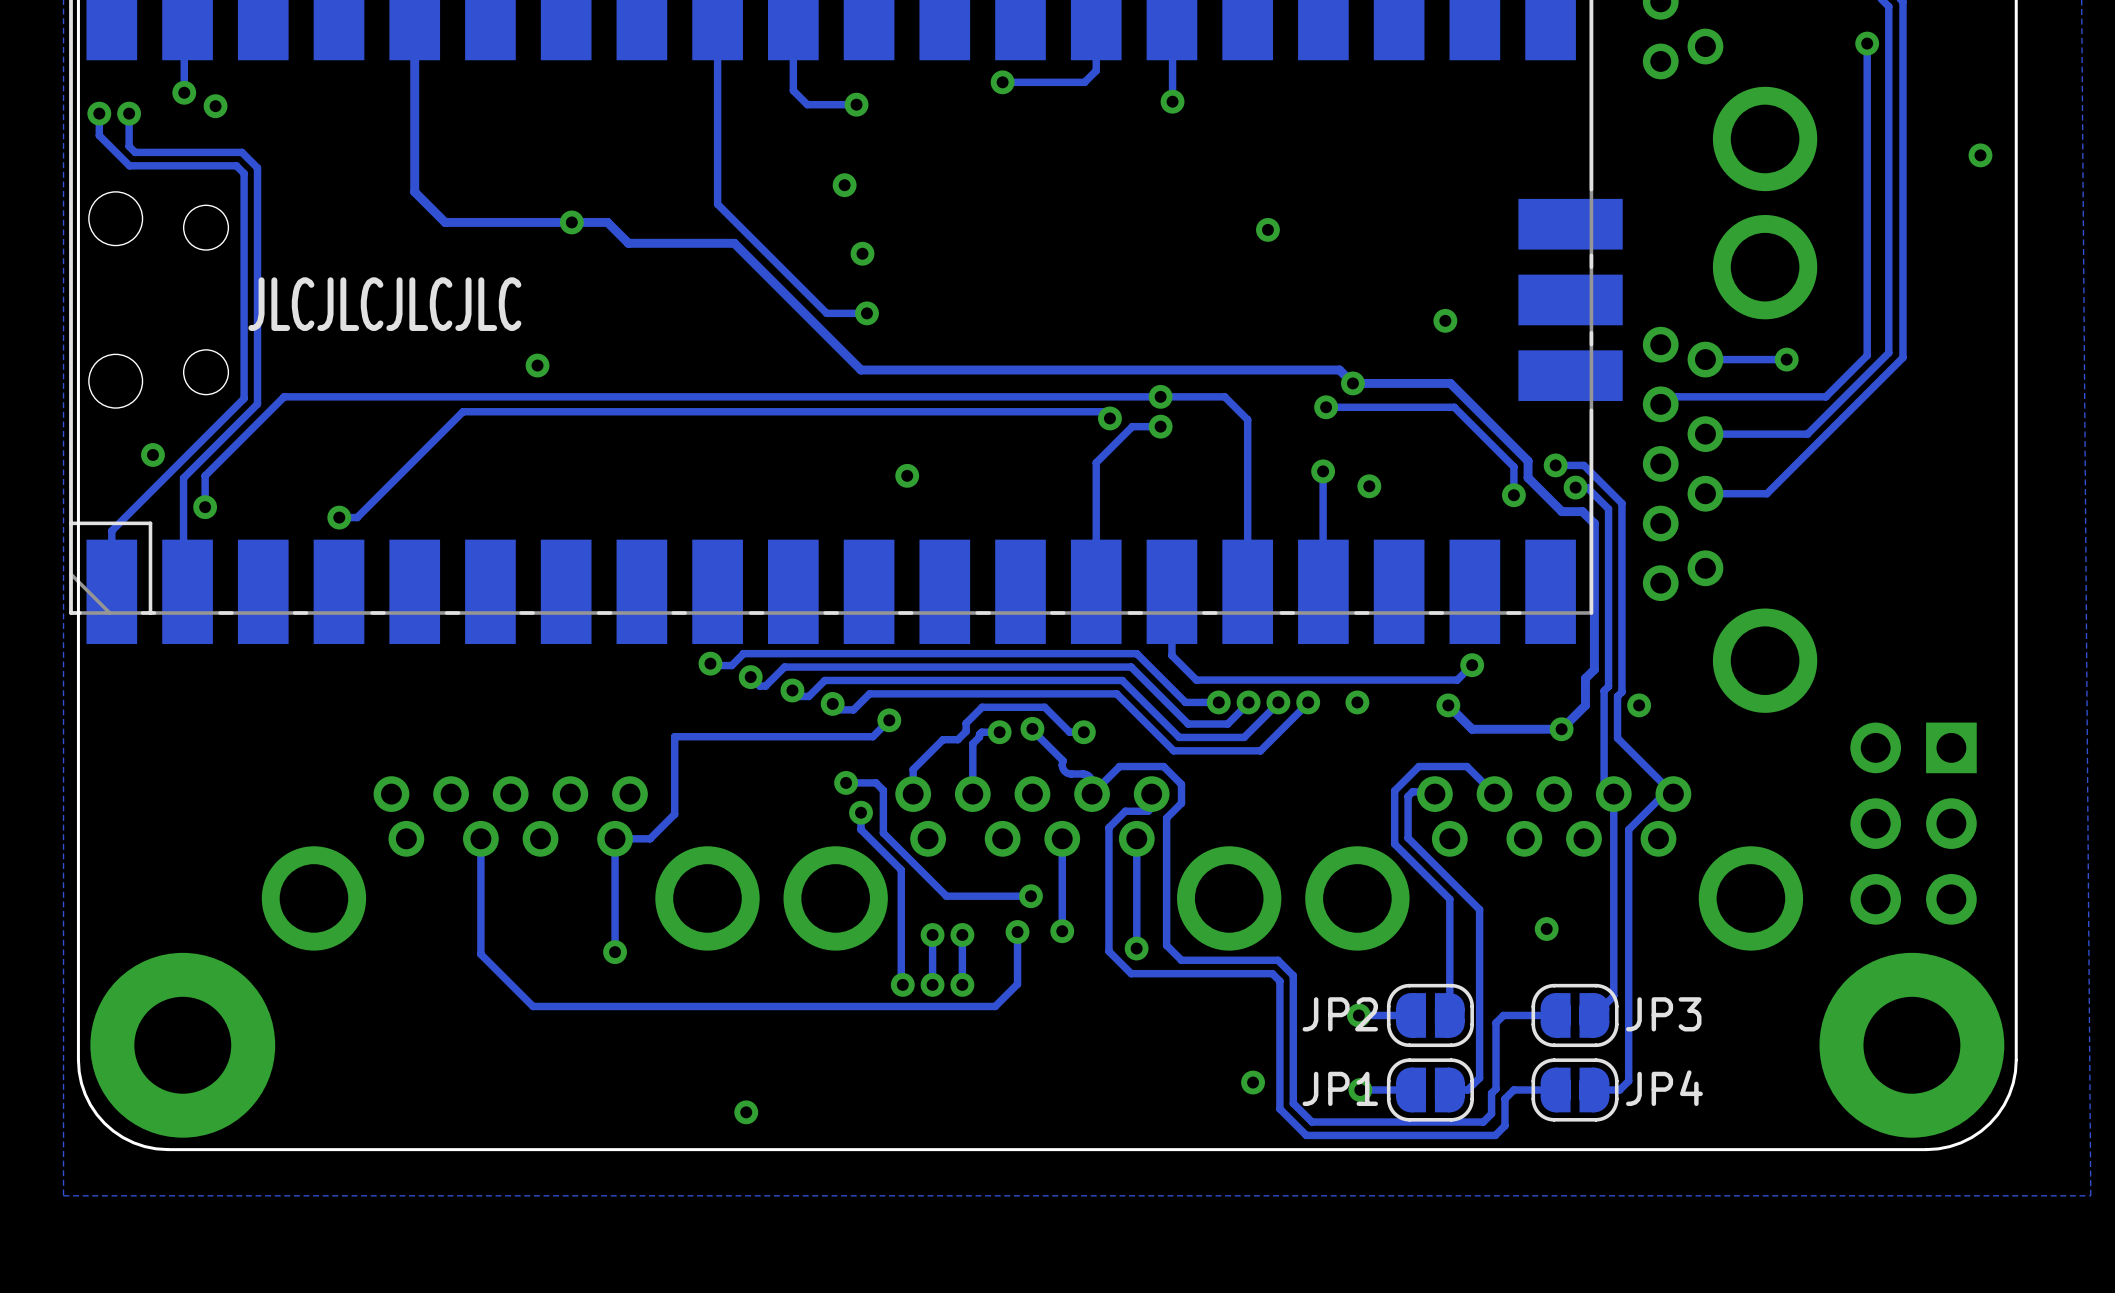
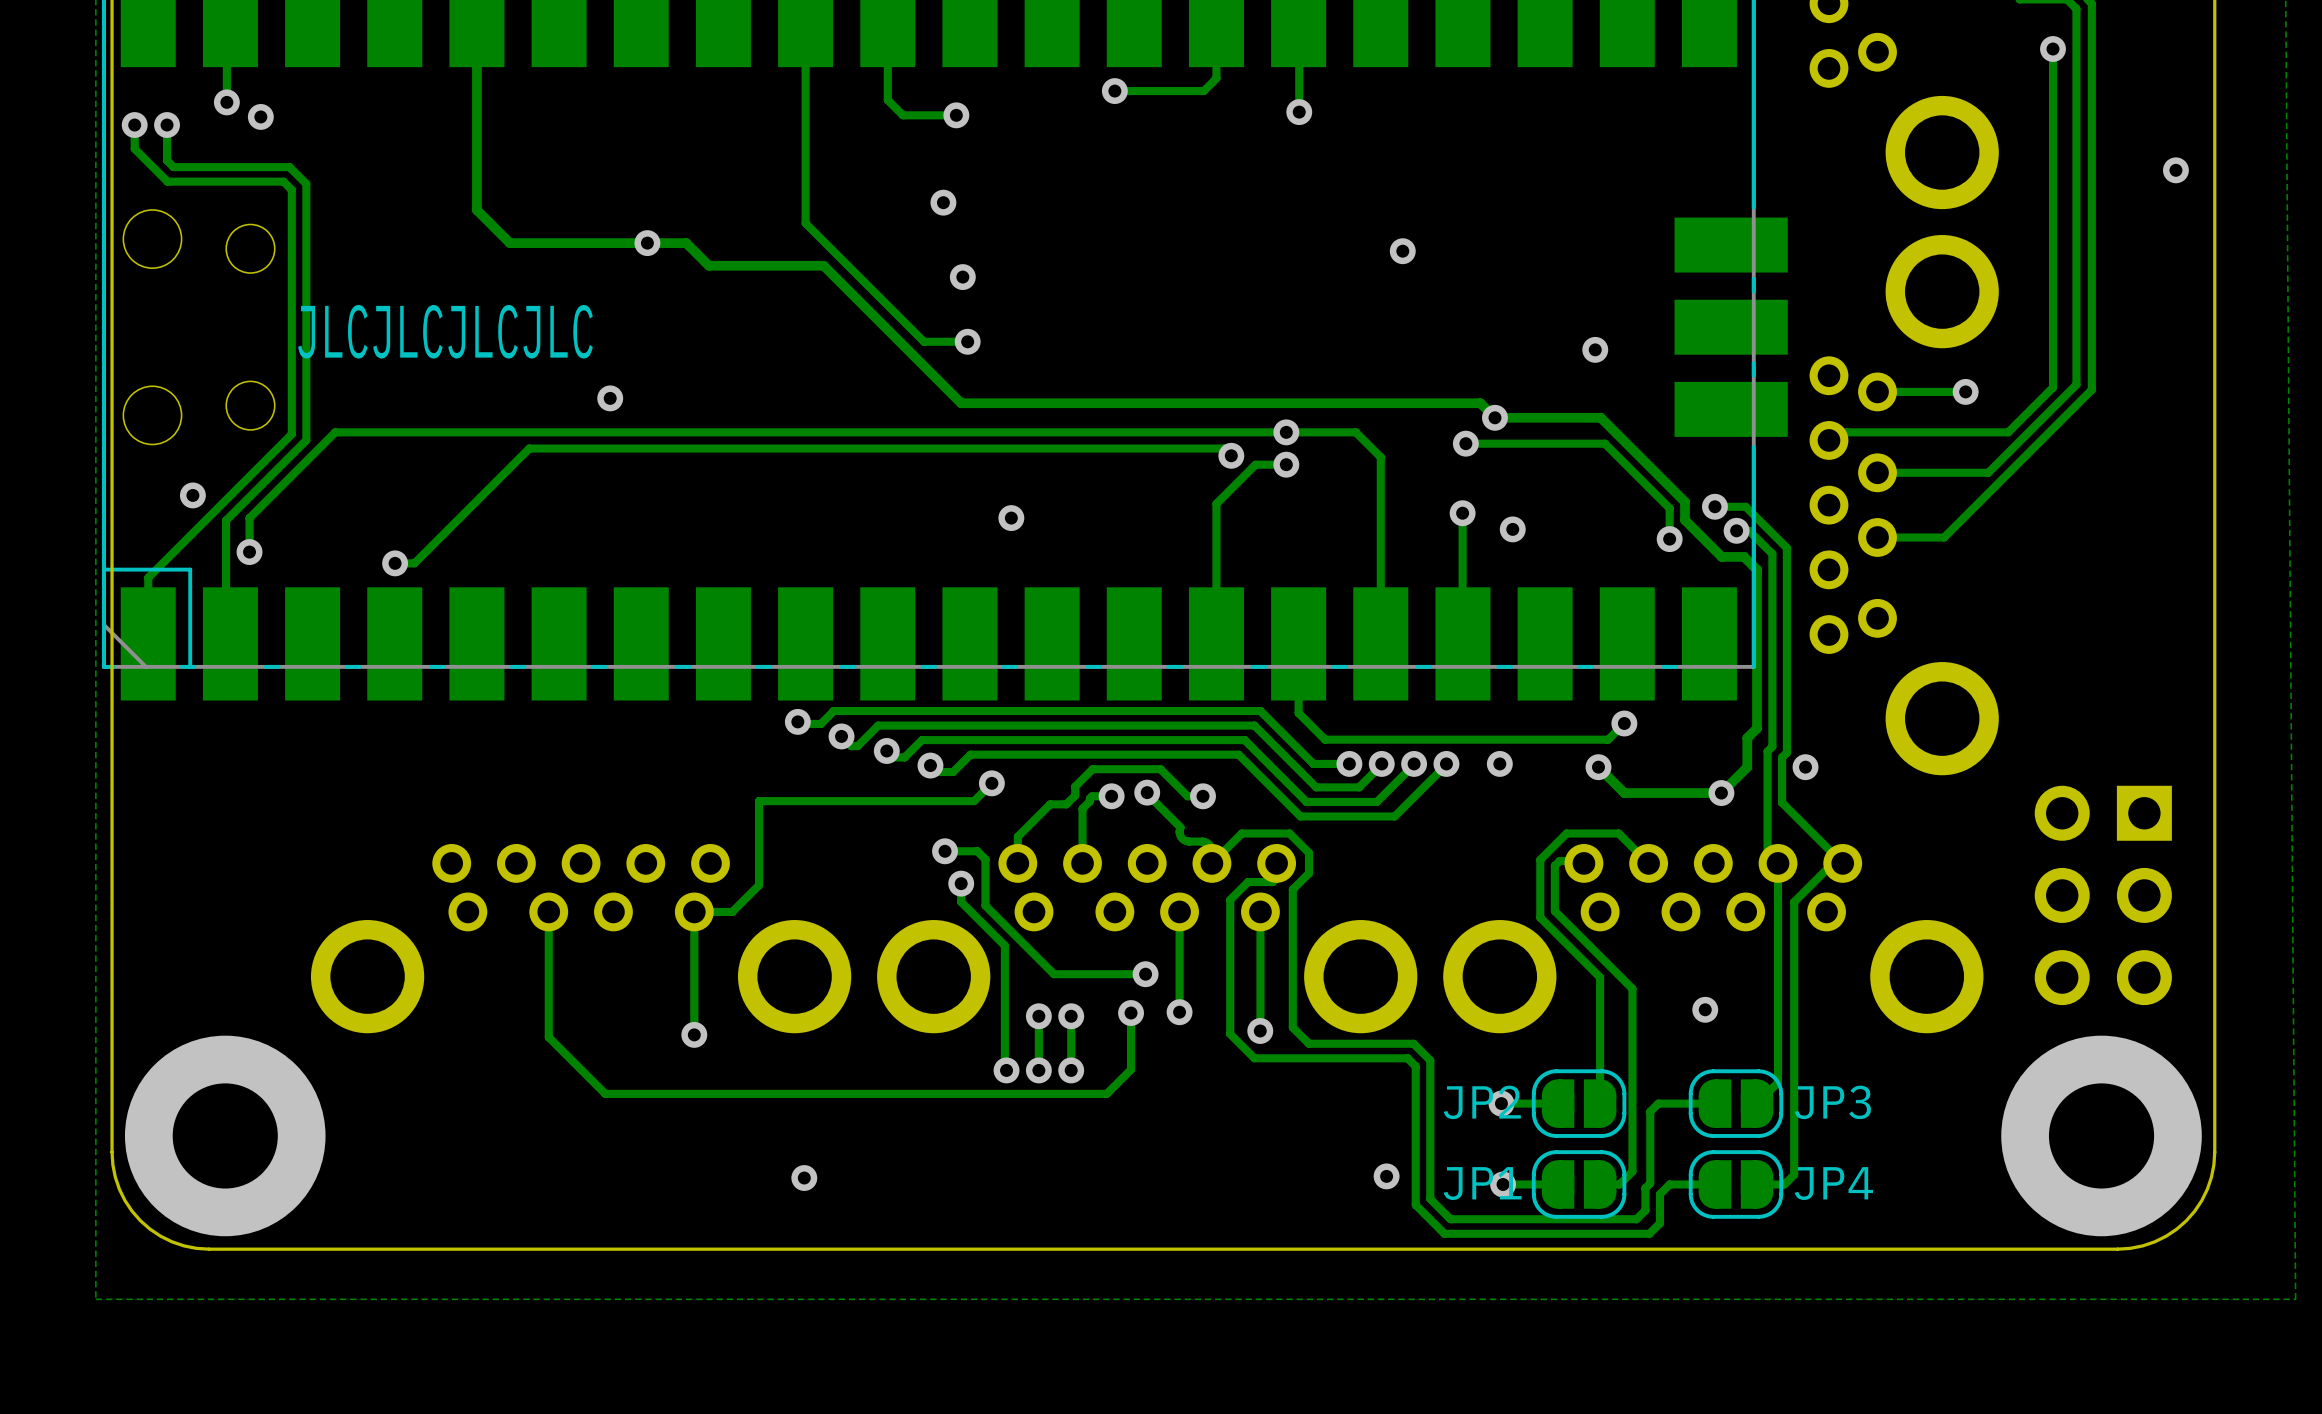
via position: (746, 1112) -> (804, 1178)

